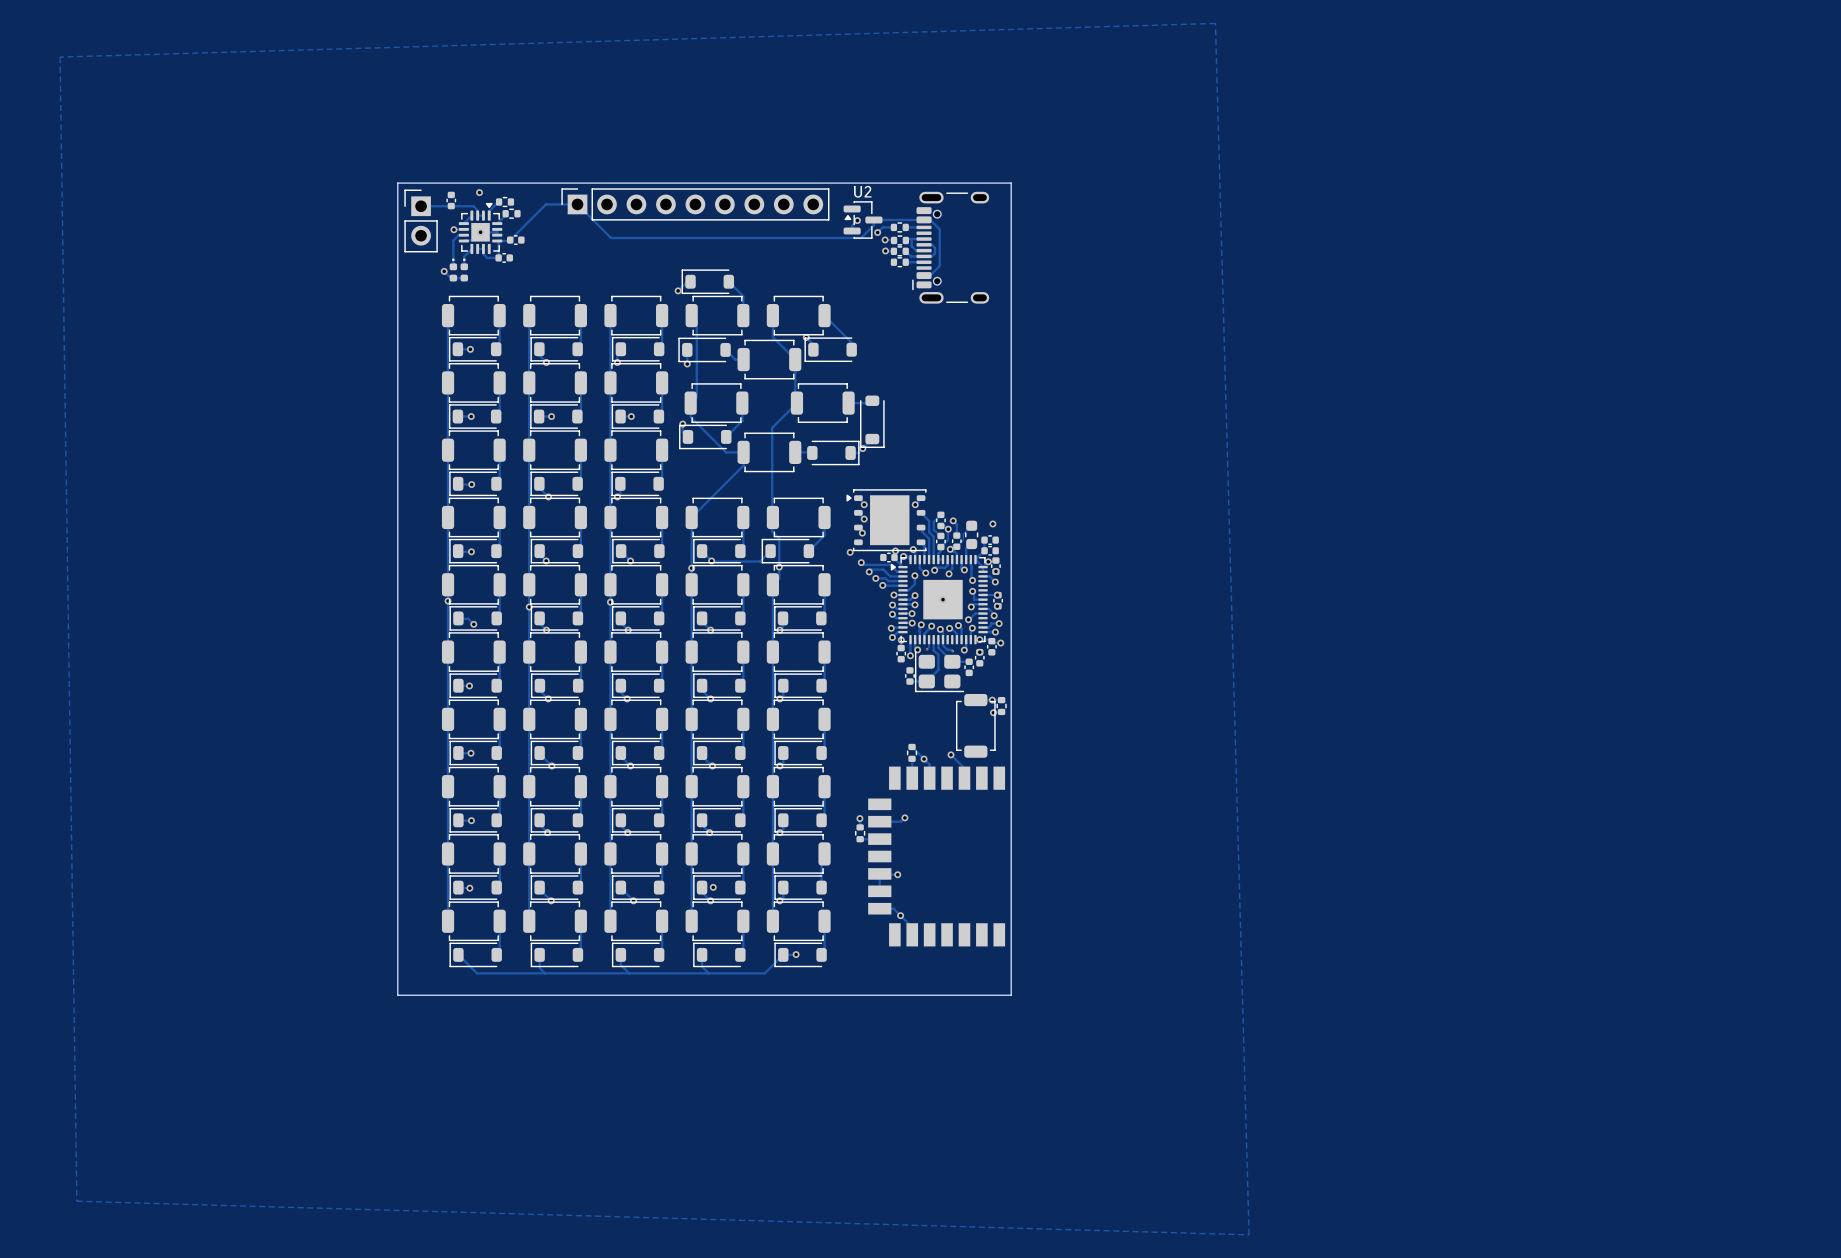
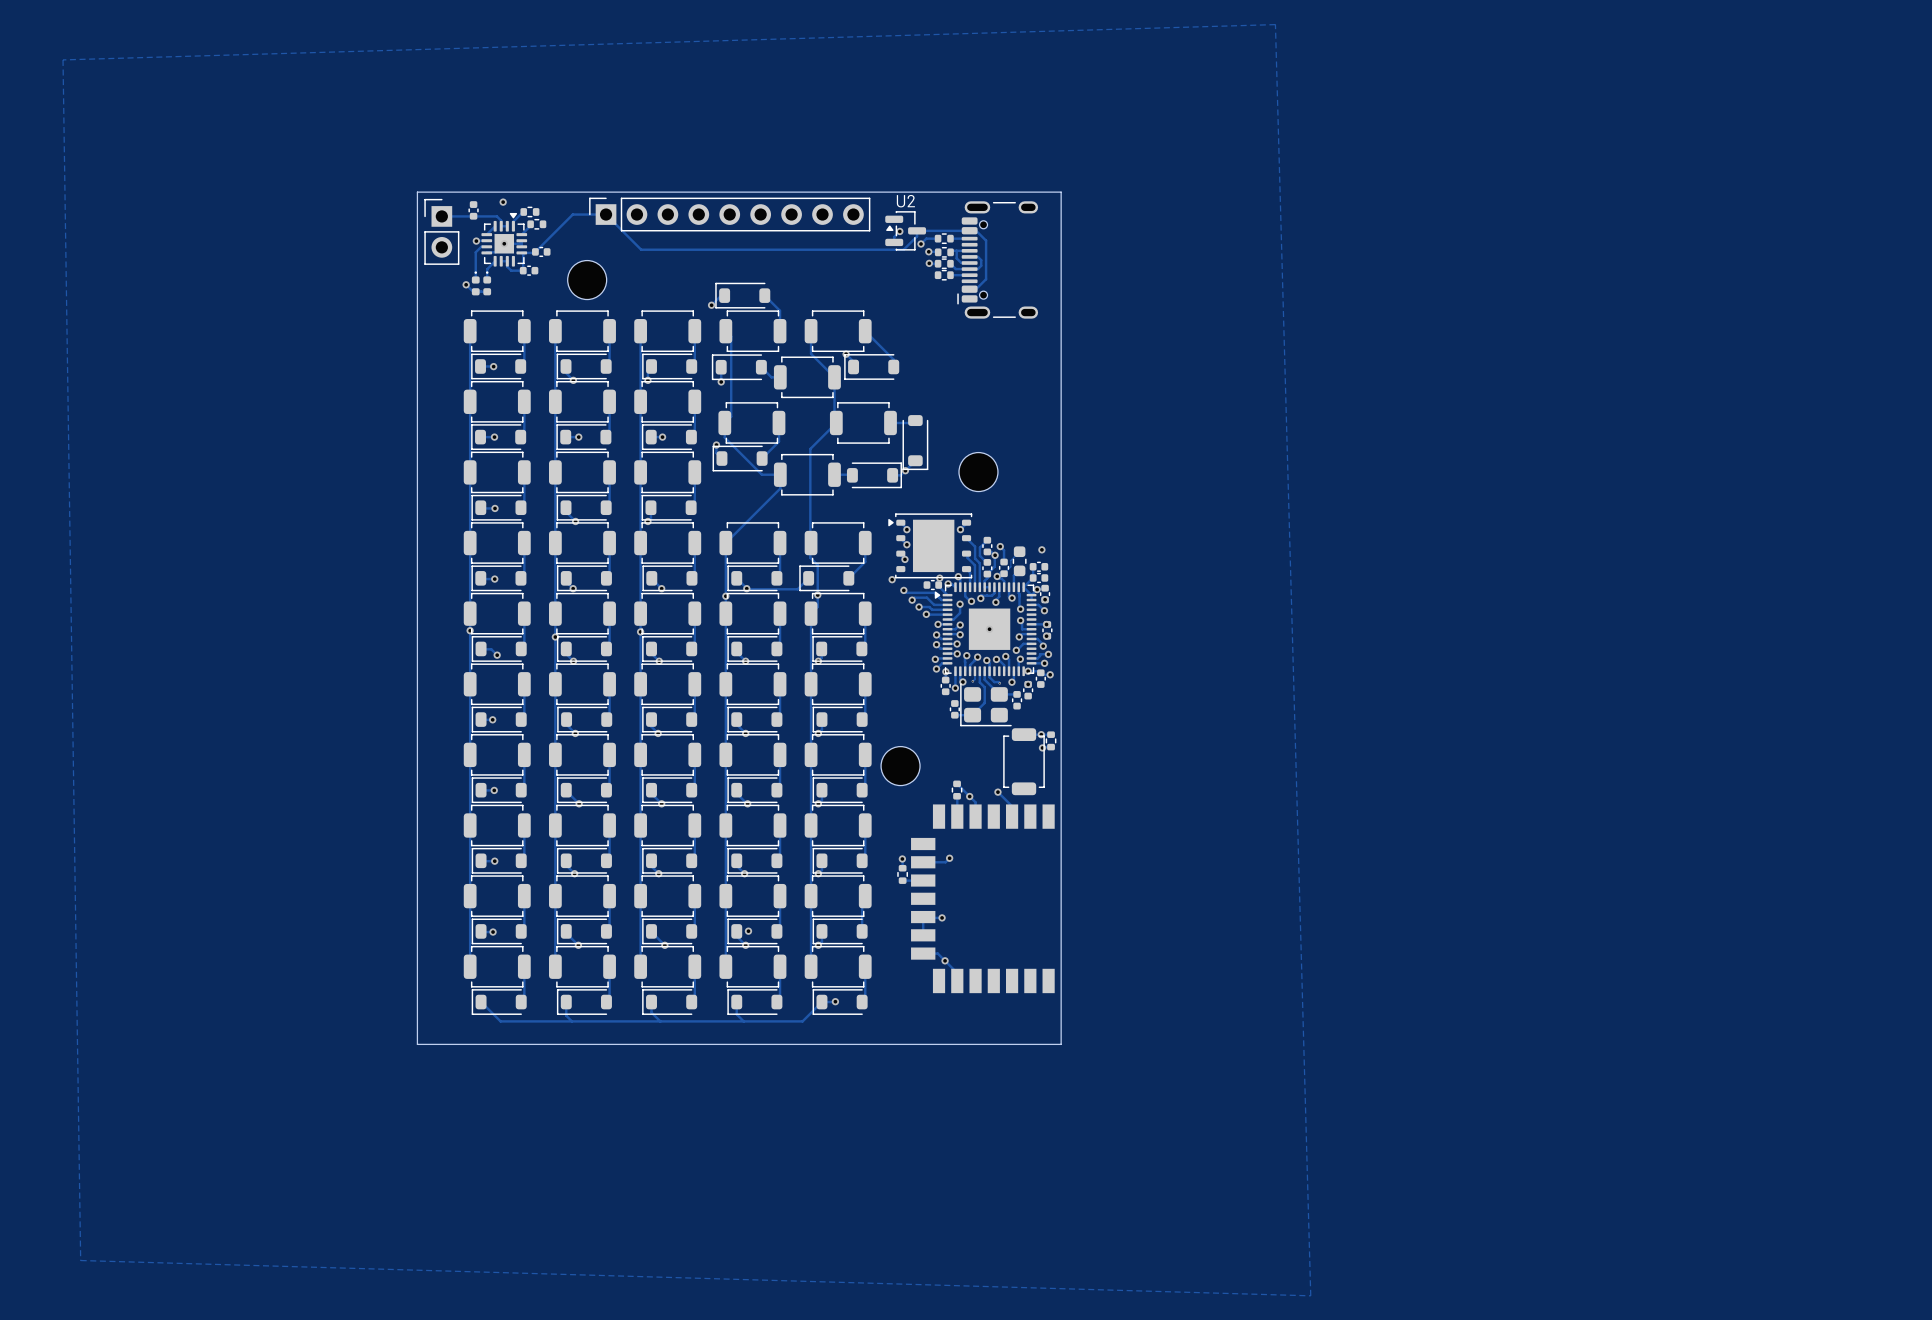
part: none -> (587, 280)
part: none -> (978, 472)
part: none -> (900, 766)

